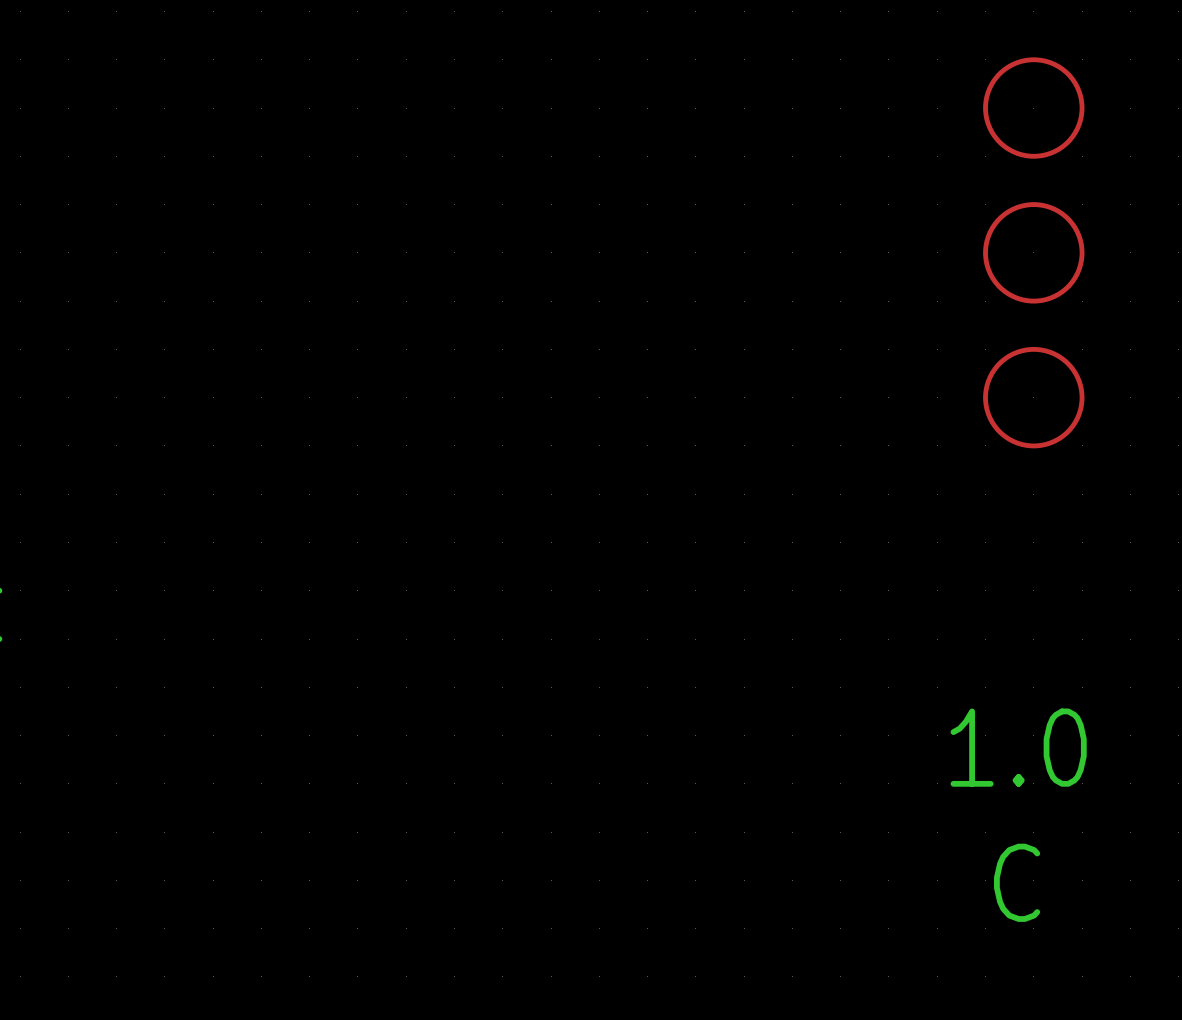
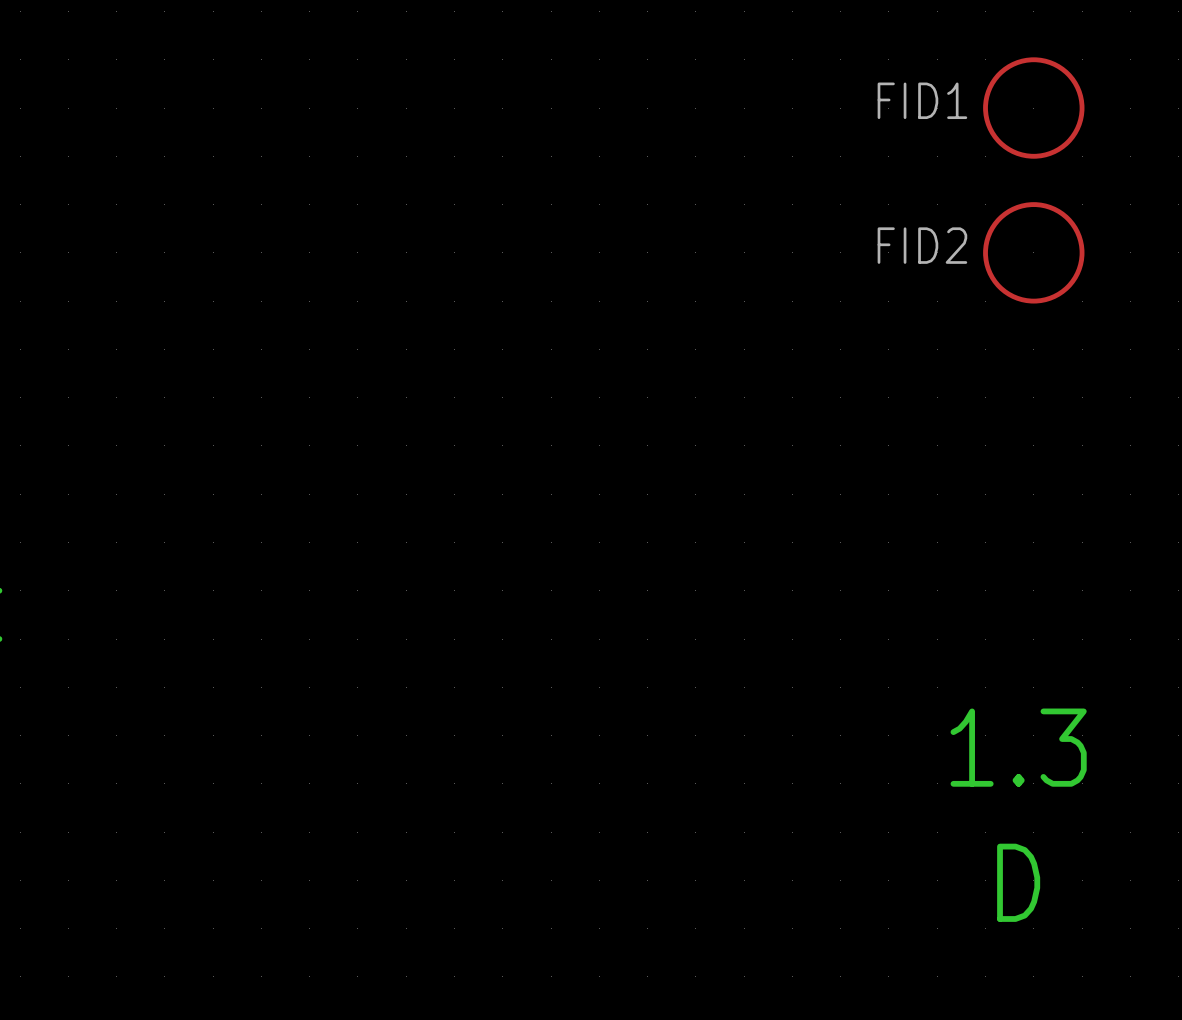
FID1 name: none -> FID1 (922, 100)
FID2 name: none -> FID2 (922, 245)
part: (1033, 397) -> none
text: 1.0 (1018, 747) -> 1.3 (1018, 747)
text: C (1017, 882) -> D (1018, 882)

